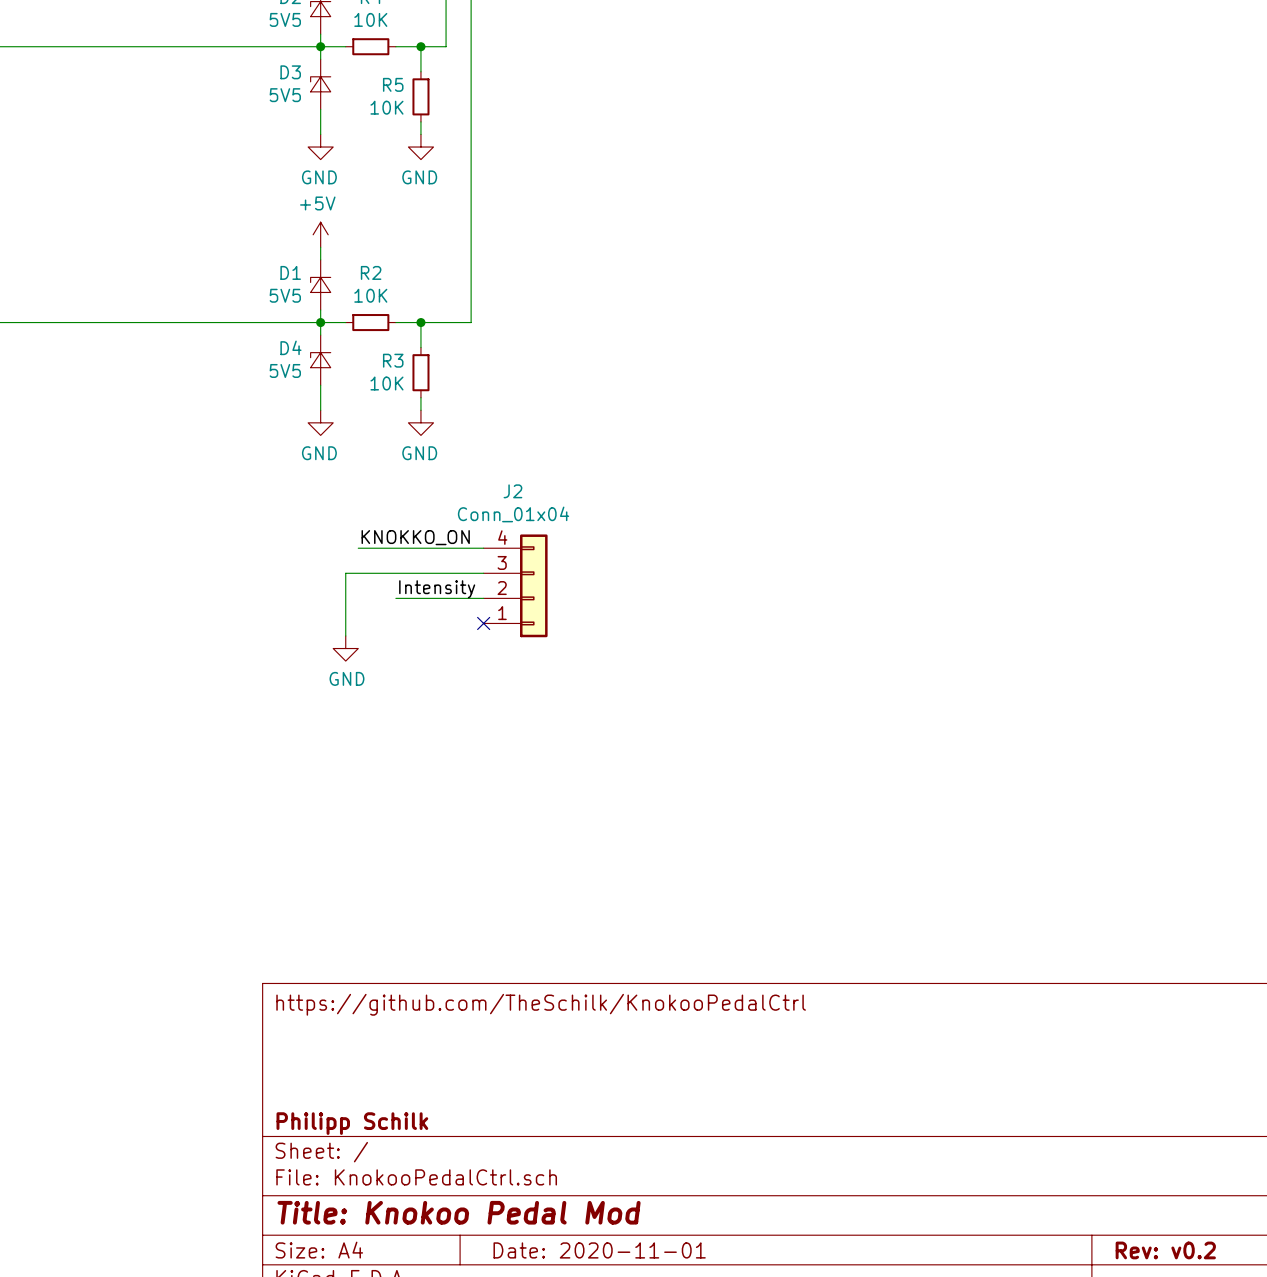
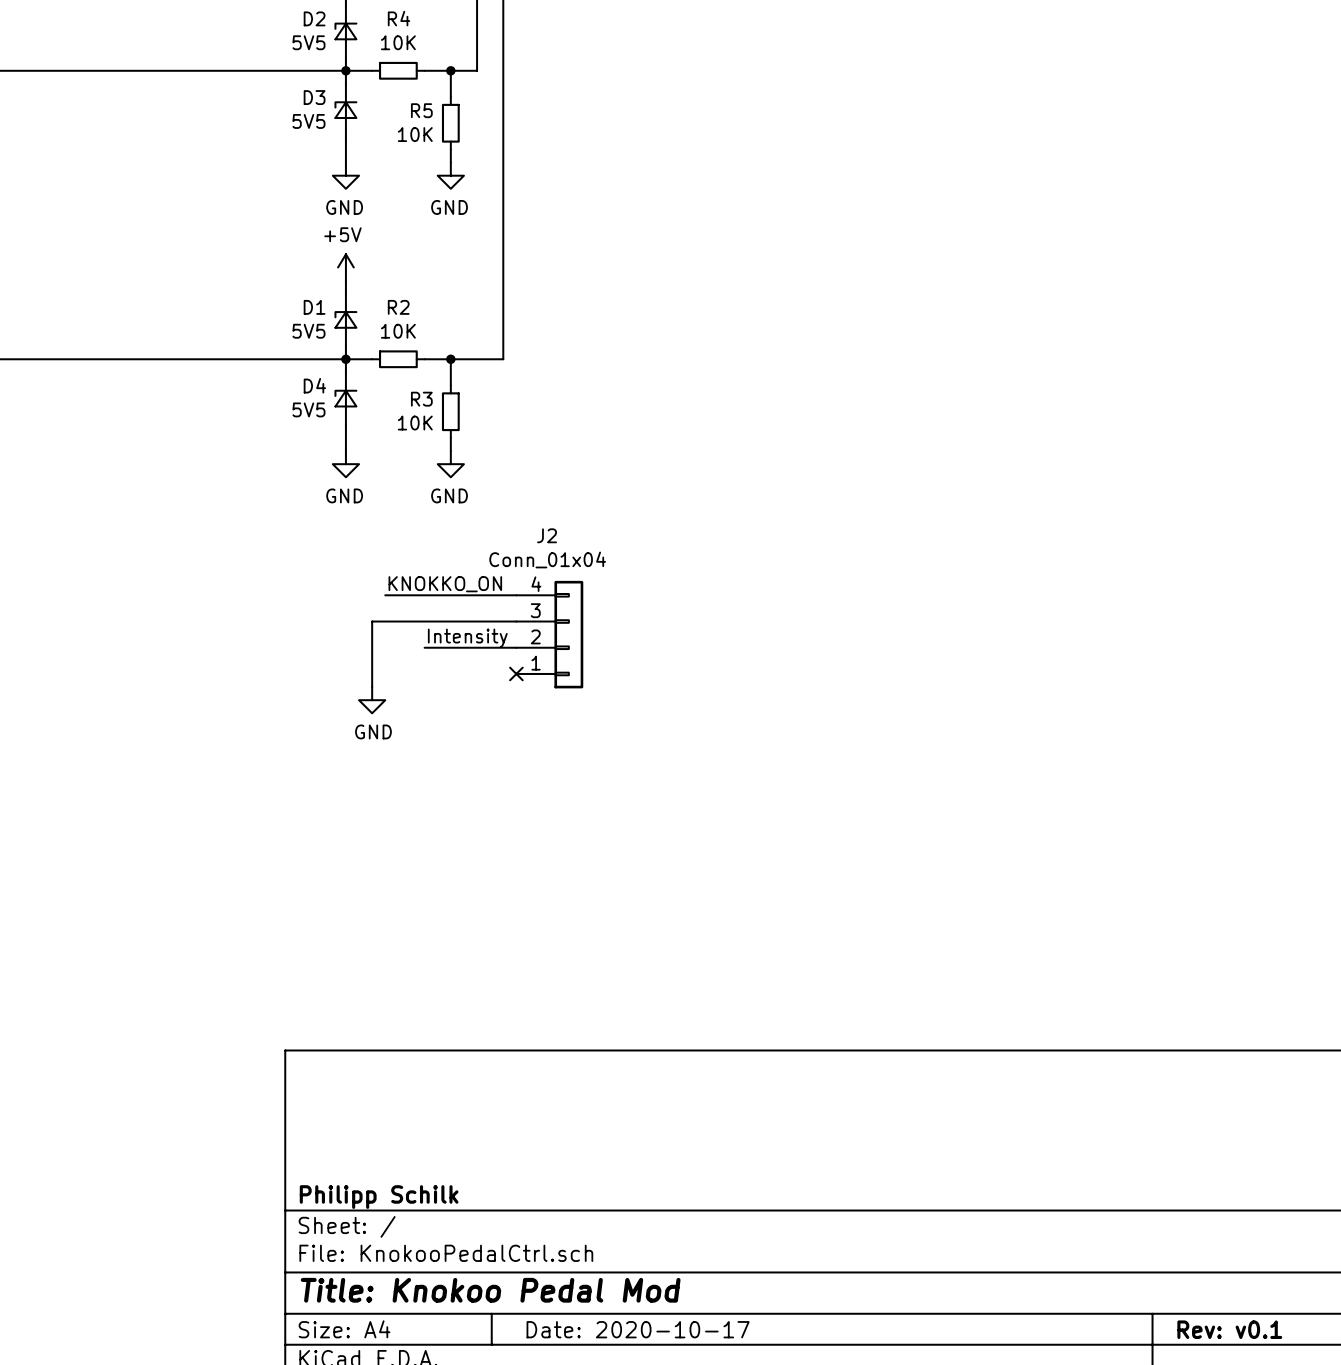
title block: https://github.com/TheSchilk/KnokooPedalCtrl (541, 1004) -> none
title block: Date: 2020-11-01 (599, 1250) -> Date: 2020-10-17 (638, 1329)
title block: Rev: v0.2 (1165, 1250) -> Rev: v0.1 (1229, 1329)

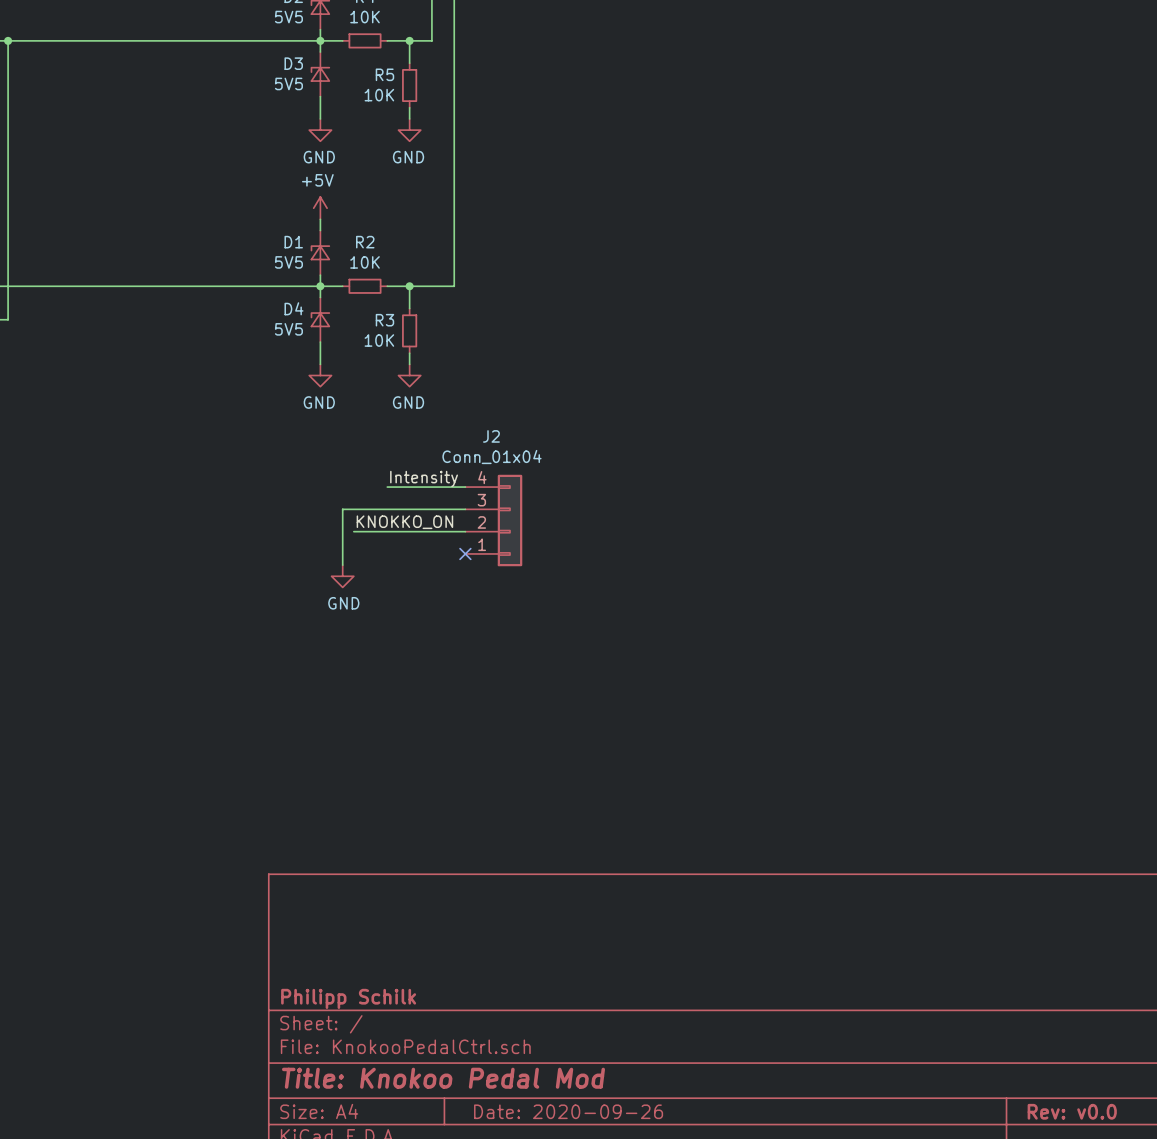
label position: KNOKKO_ON (445, 584) -> KNOKKO_ON (404, 522)
wire: (385, 595) (424, 595) -> (353, 531) (387, 531)
label position: Intensity (467, 638) -> Intensity (424, 478)
title block: Date: 2020-10-17 (638, 1329) -> Date: 2020-09-26 (568, 1111)
title block: Rev: v0.1 (1229, 1329) -> Rev: v0.0 (1072, 1111)

